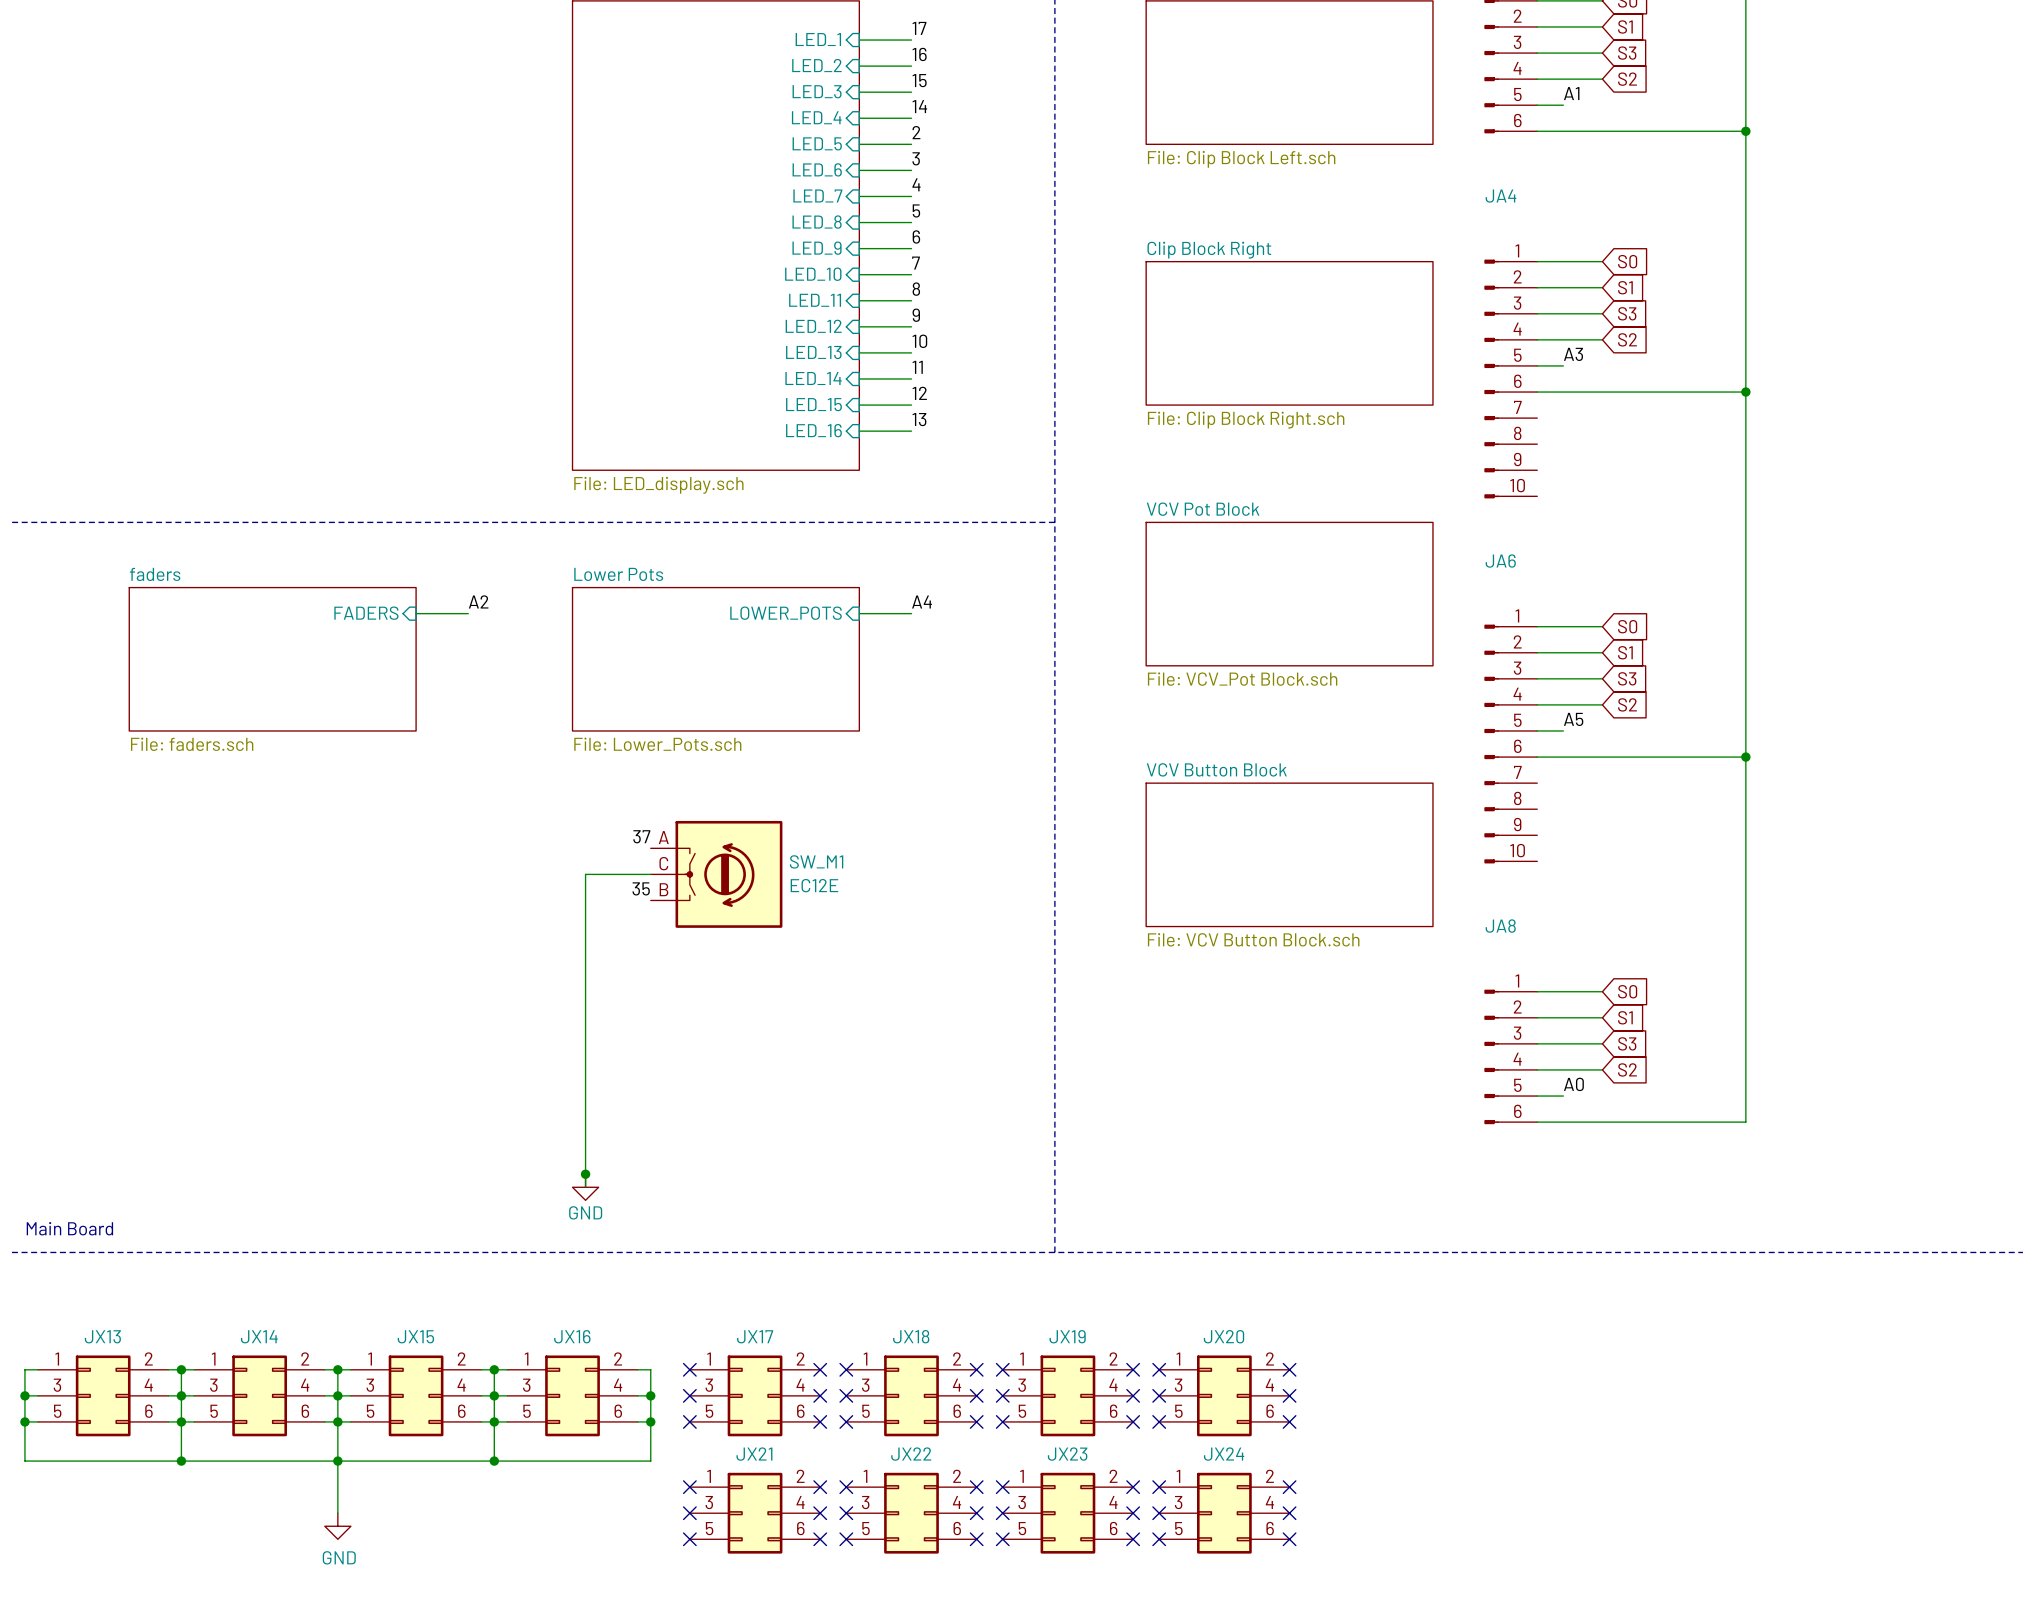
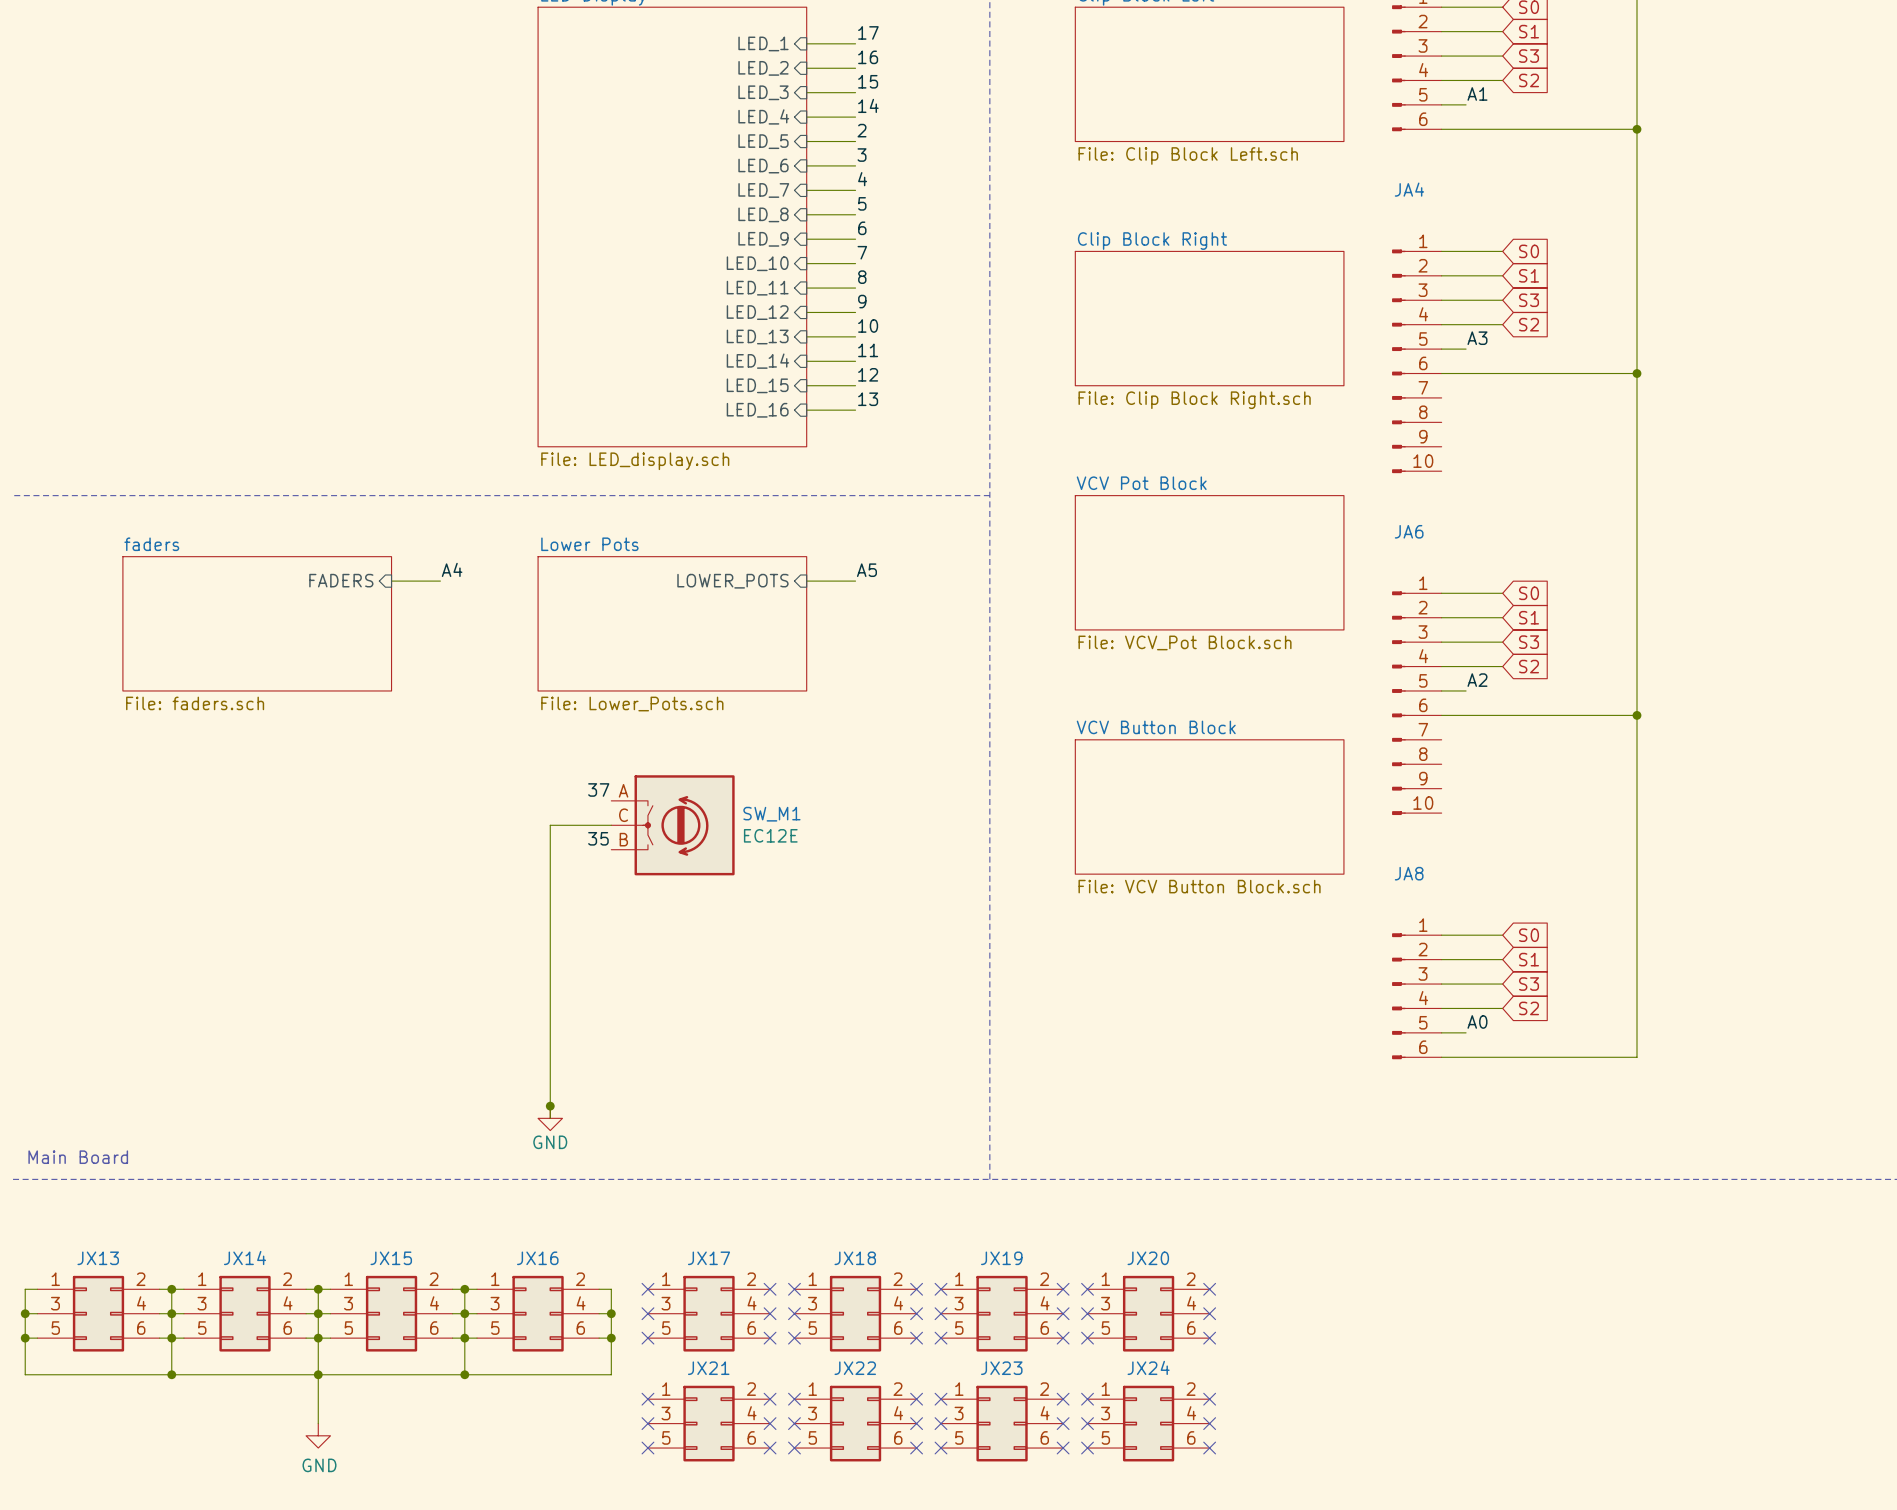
label: A2 (478, 601) -> A4 (452, 569)
label: A4 (922, 602) -> A5 (866, 570)
label: A5 (1573, 719) -> A2 (1477, 680)

